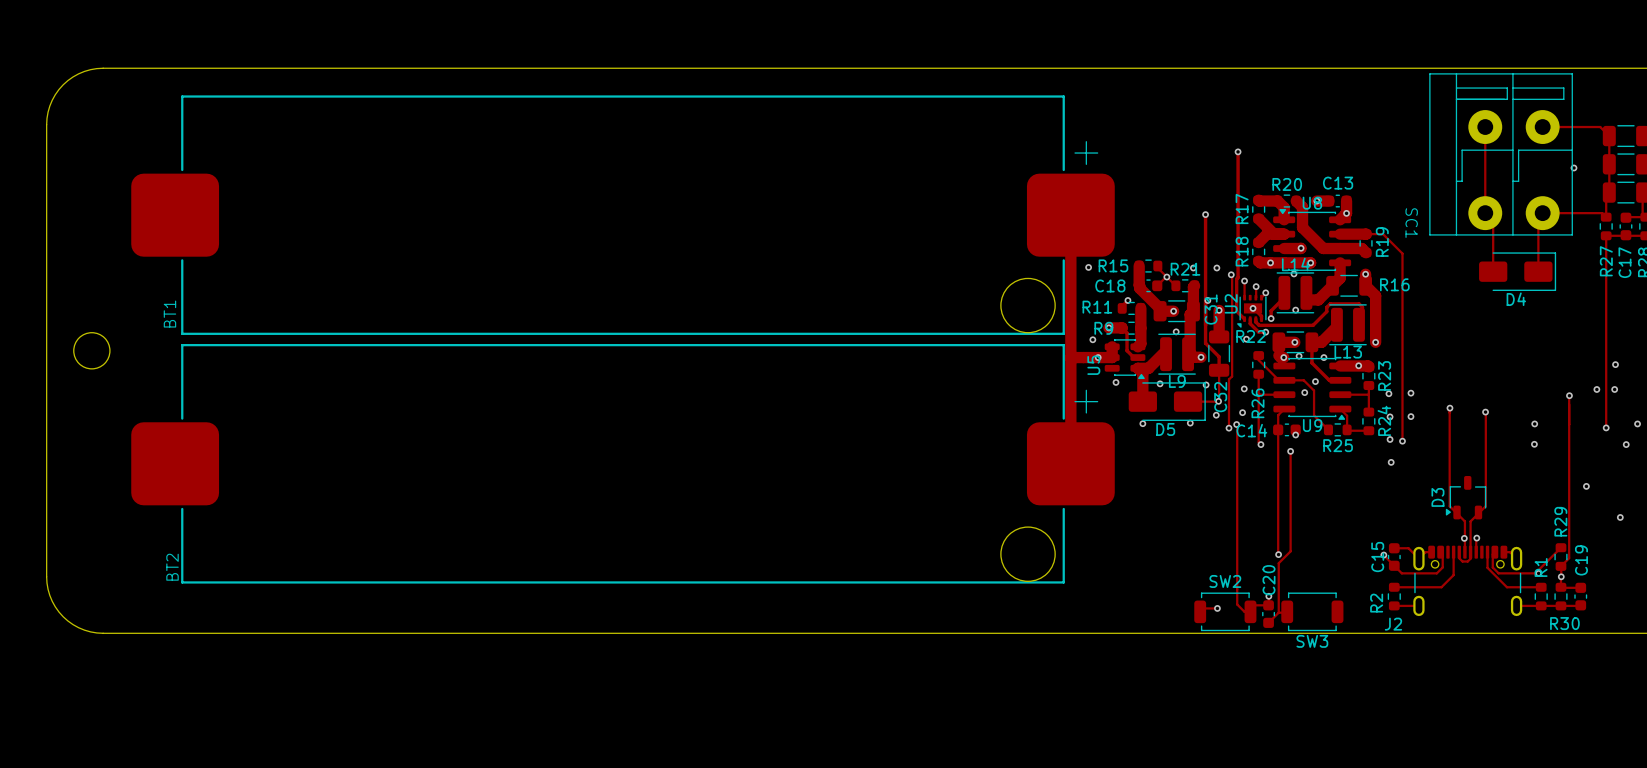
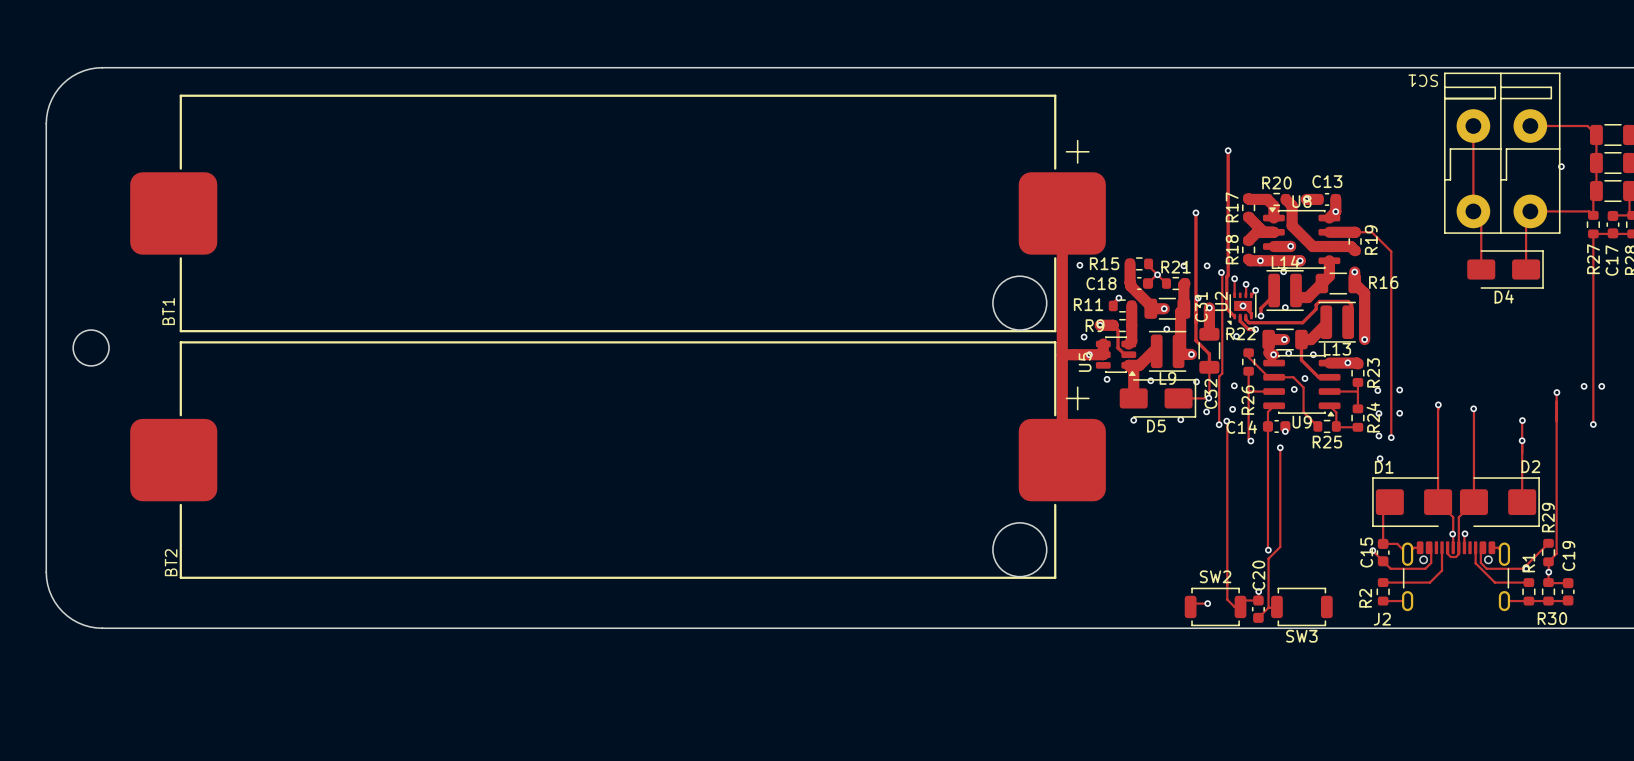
SC1 footprint: [1429, 73, 1573, 236] -> [1444, 72, 1561, 234]
SC1 name position: SC1 (1411, 223) -> SC1 (1423, 80)
via: (1615, 364) -> none
via: (1637, 423) -> none
track: none -> (1522, 420) (1522, 502)
via: (1626, 444) -> none
via: (1586, 486) -> none
D3: (1466, 497) -> none
track: none -> (1389, 502) (1383, 508) (1383, 543)
D1: none -> (1412, 502)
D2: none -> (1499, 502)
via: (1620, 517) -> none

